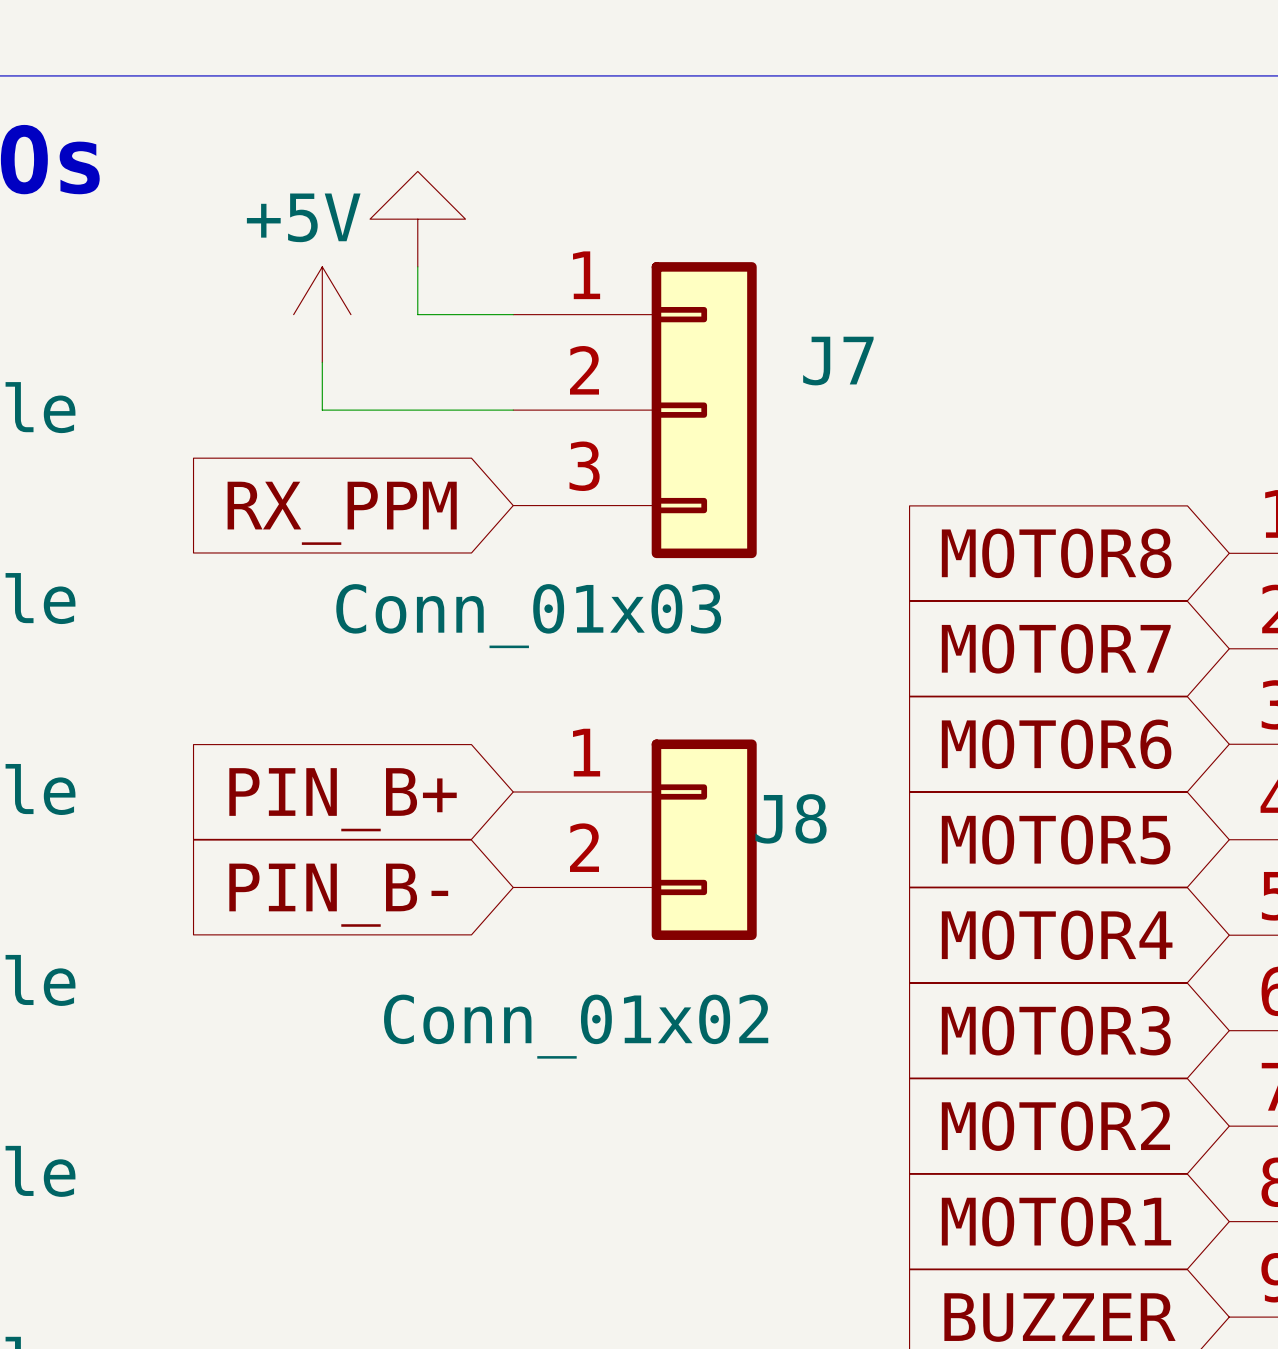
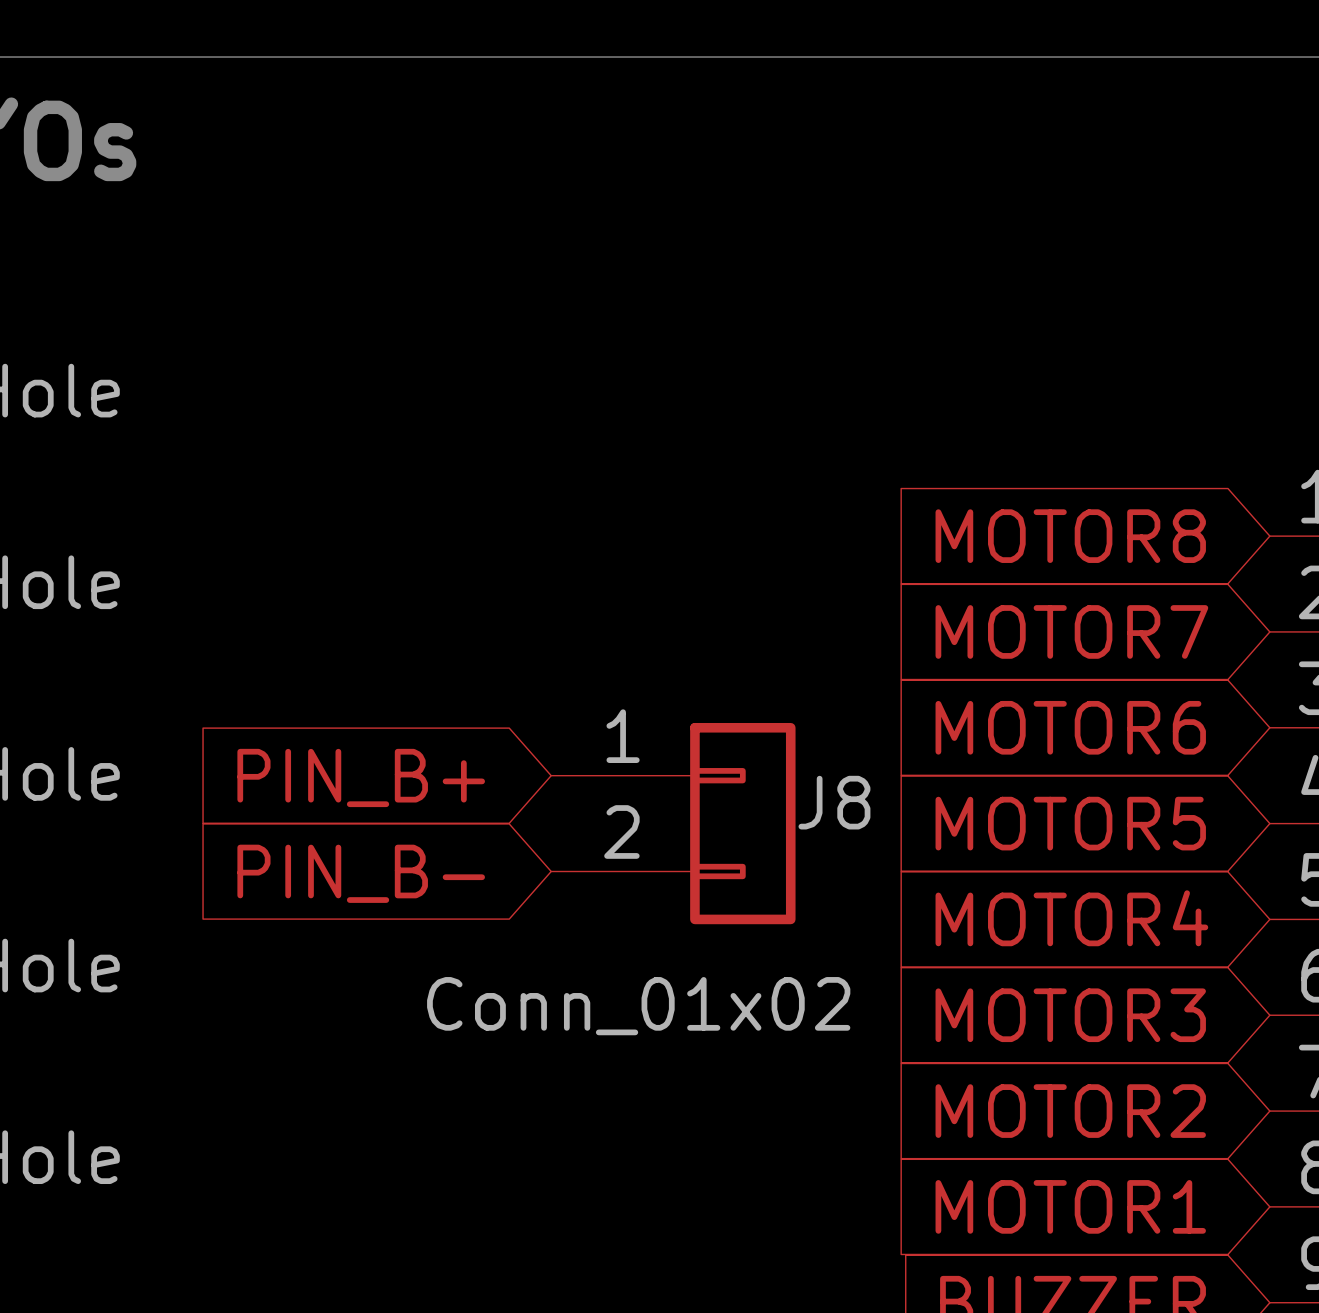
power symbol: (417, 219) -> none
wire: (417, 266) (417, 314) (513, 314) -> none
power symbol: +5V (322, 314) -> none
wire: (322, 362) (322, 410) (513, 410) -> none
J7: Conn_01x03 (634, 410) -> none
global label: RX_PPM (342, 513) -> none

